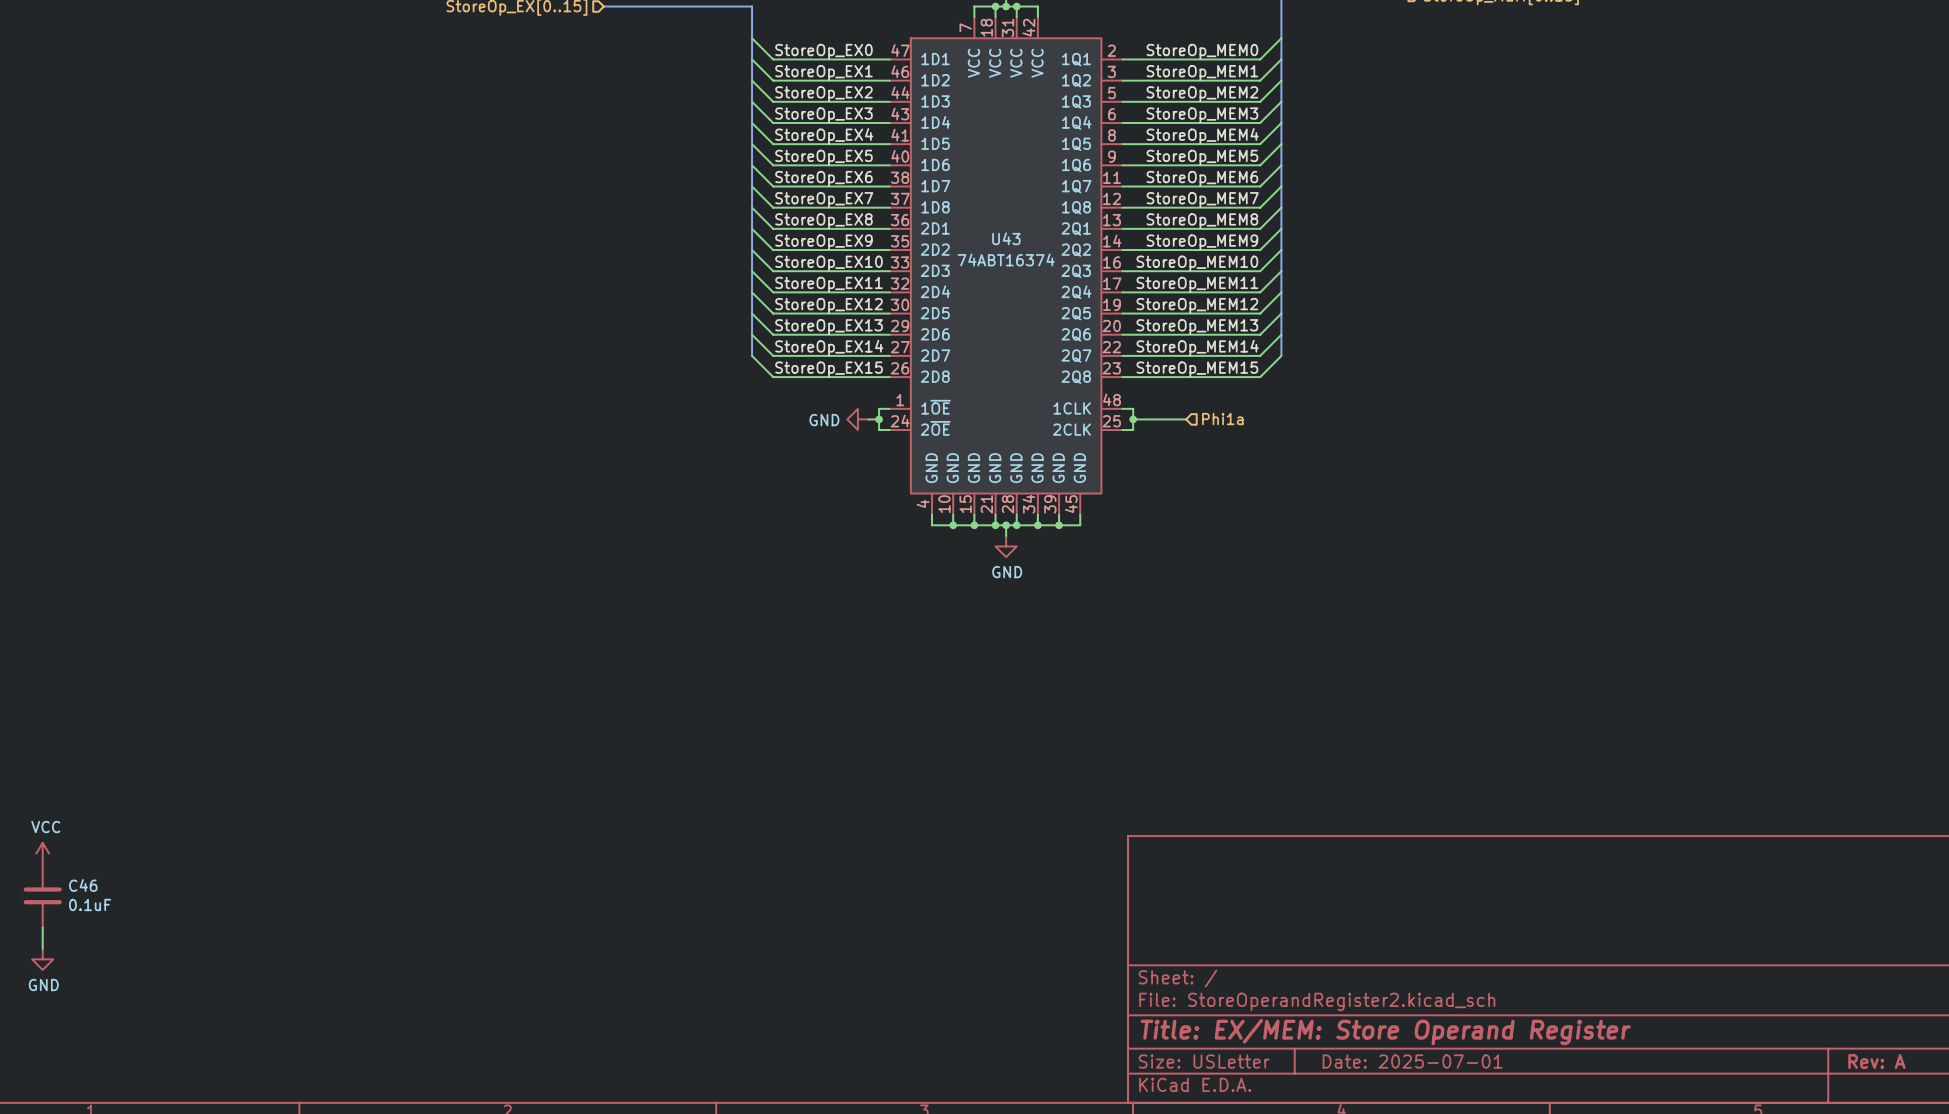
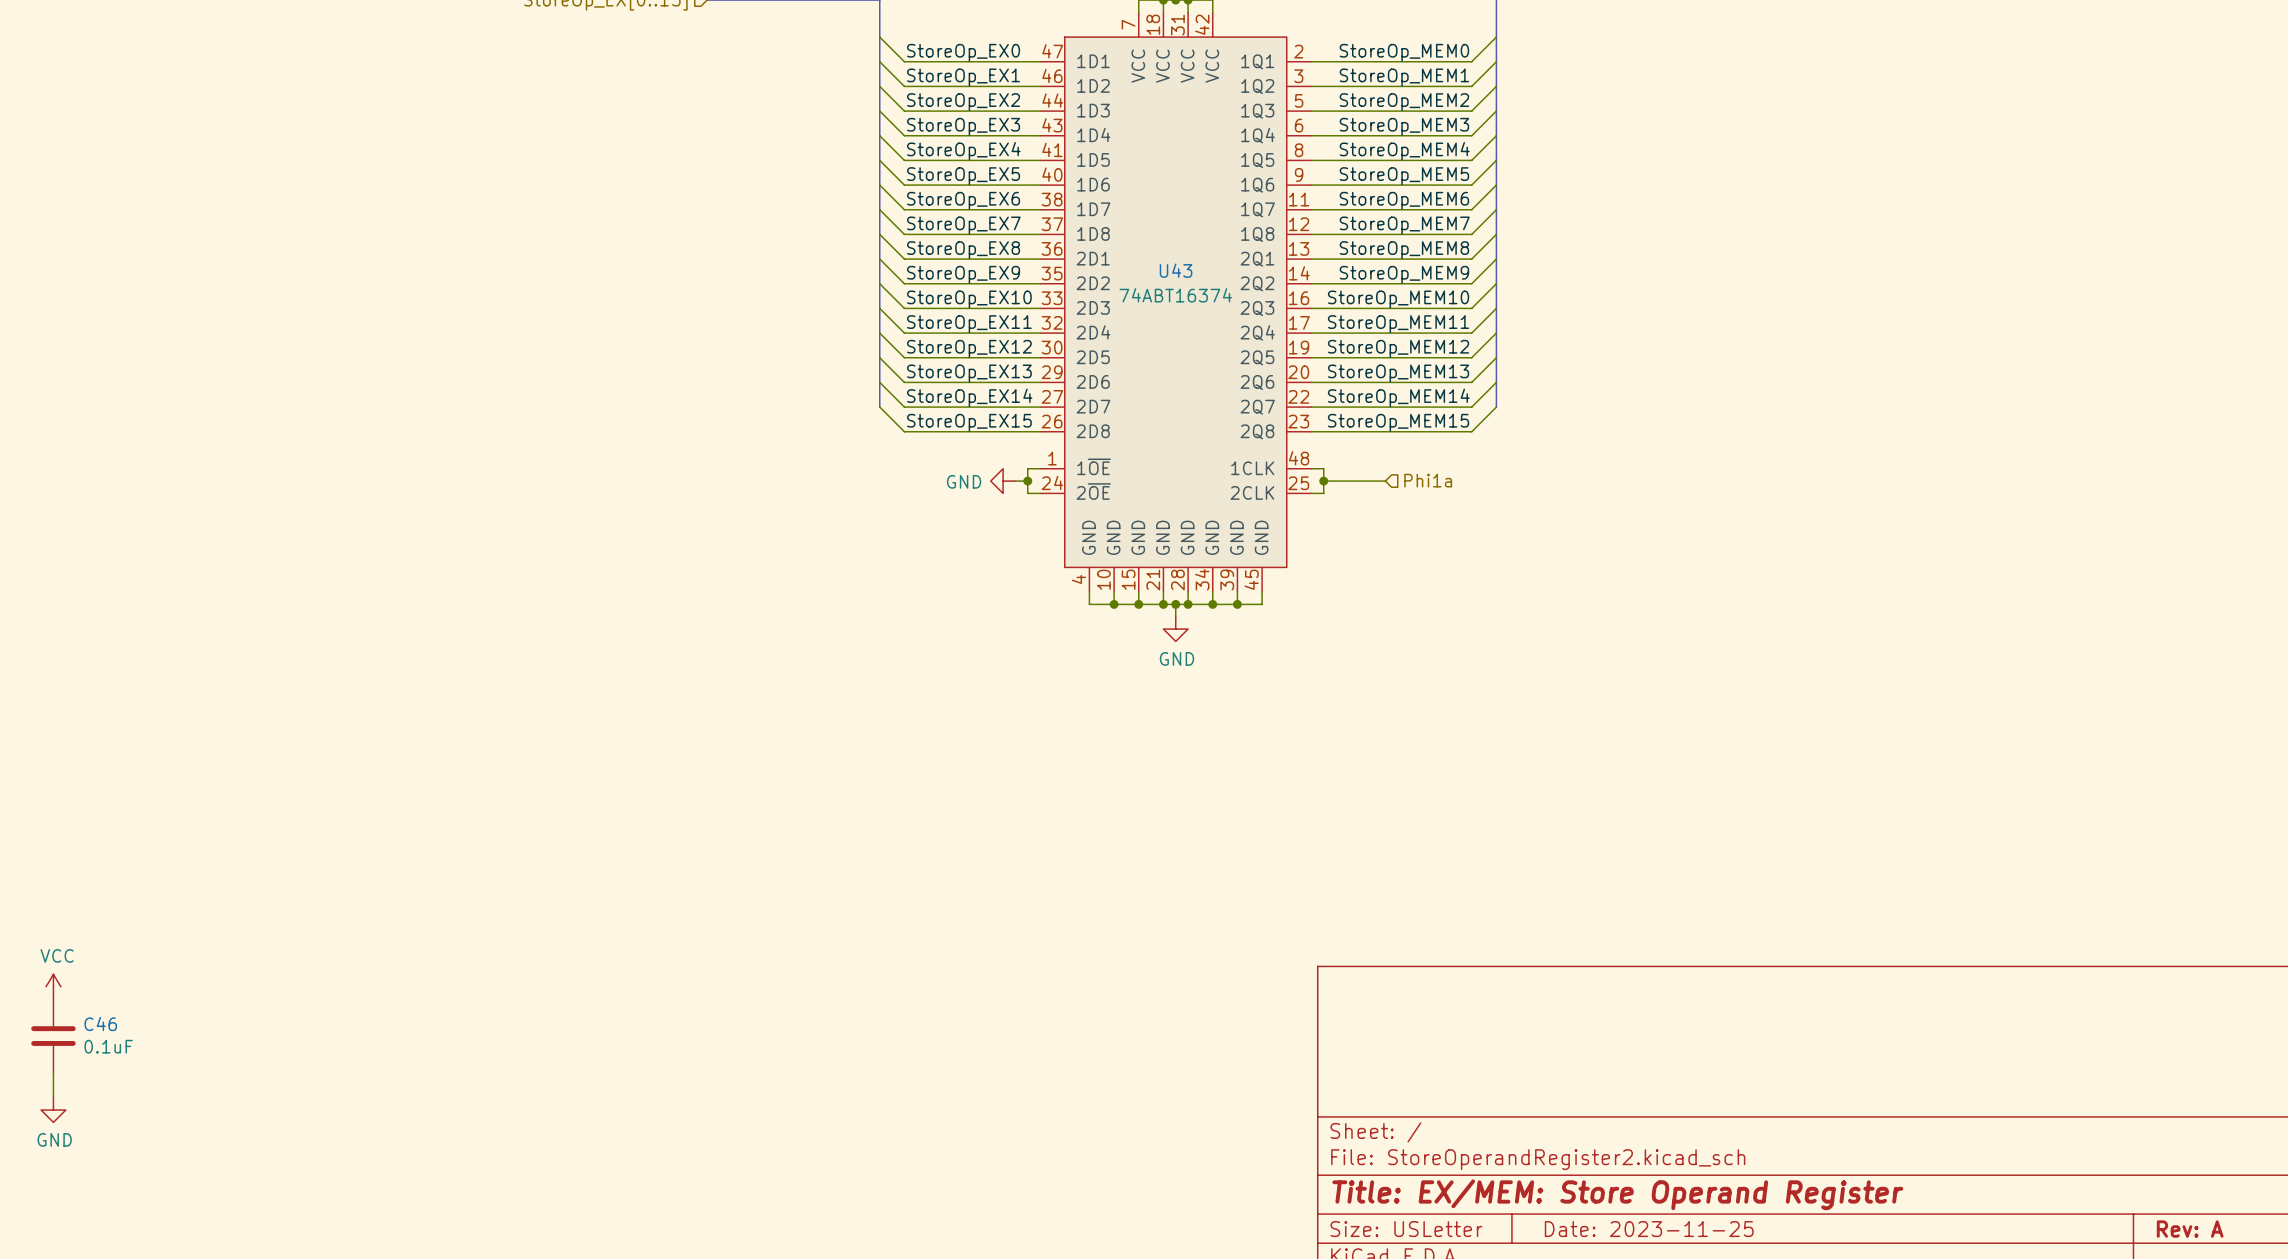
title block: Date: 2025-07-01 (1412, 1061) -> Date: 2023-11-25 (1649, 1229)

